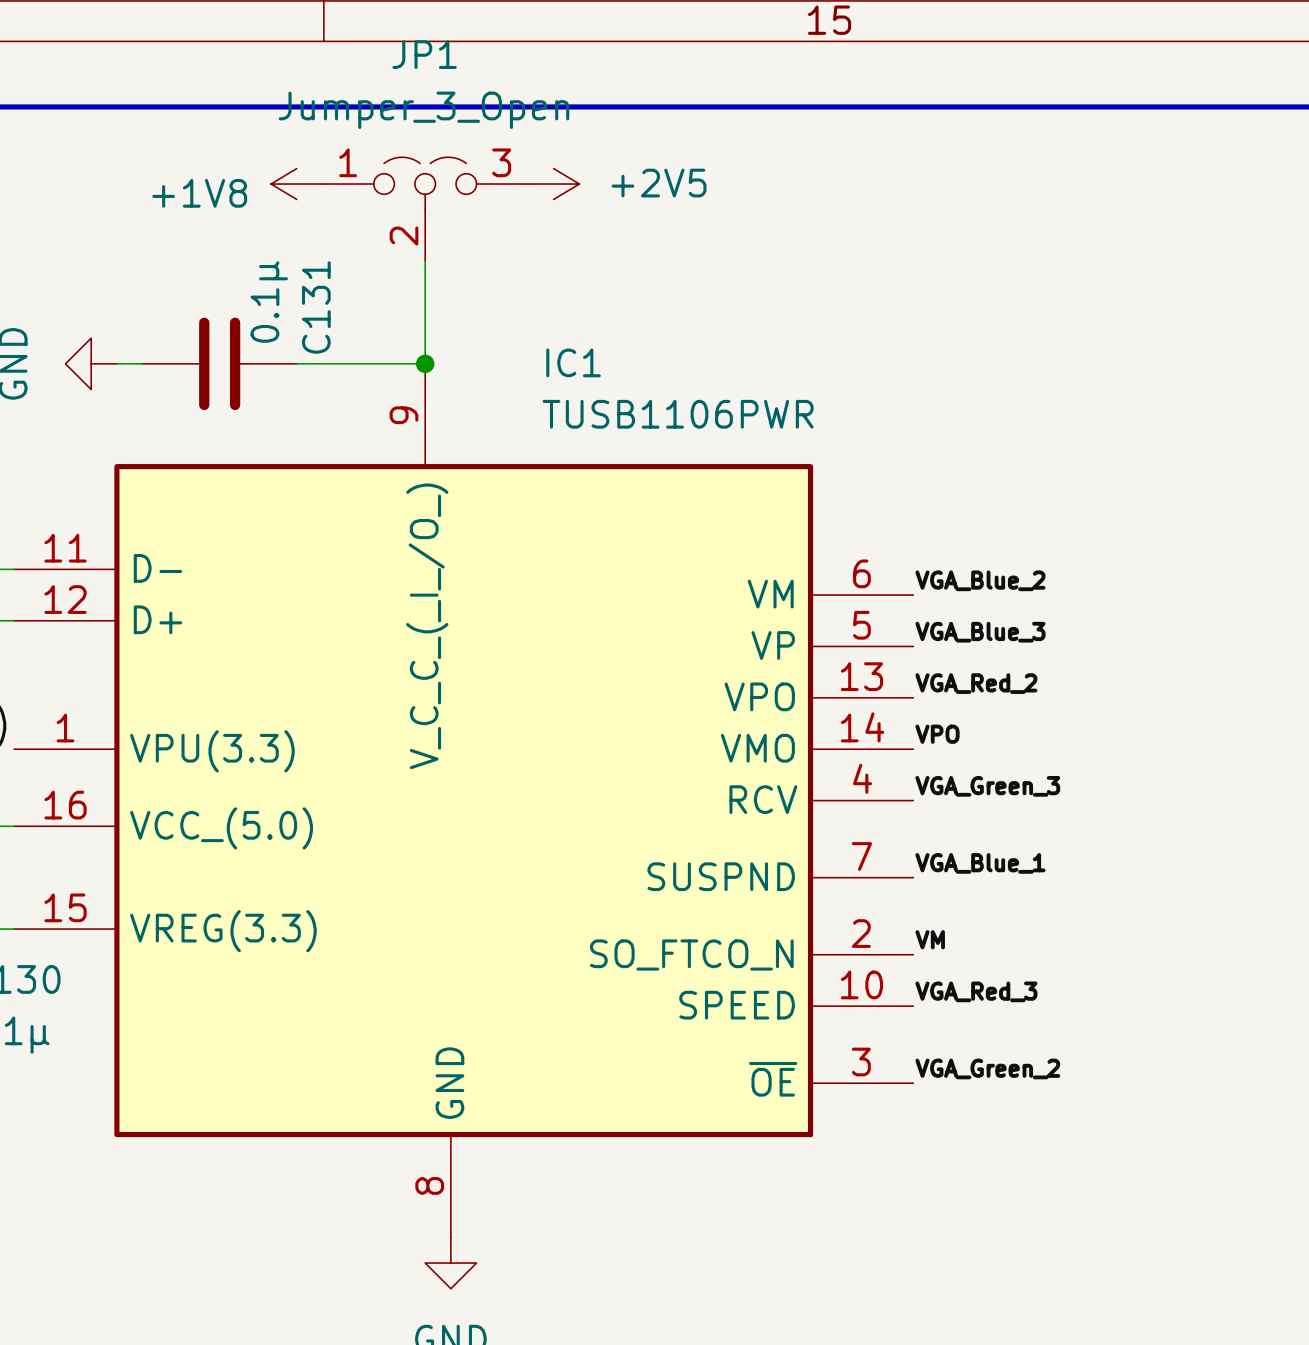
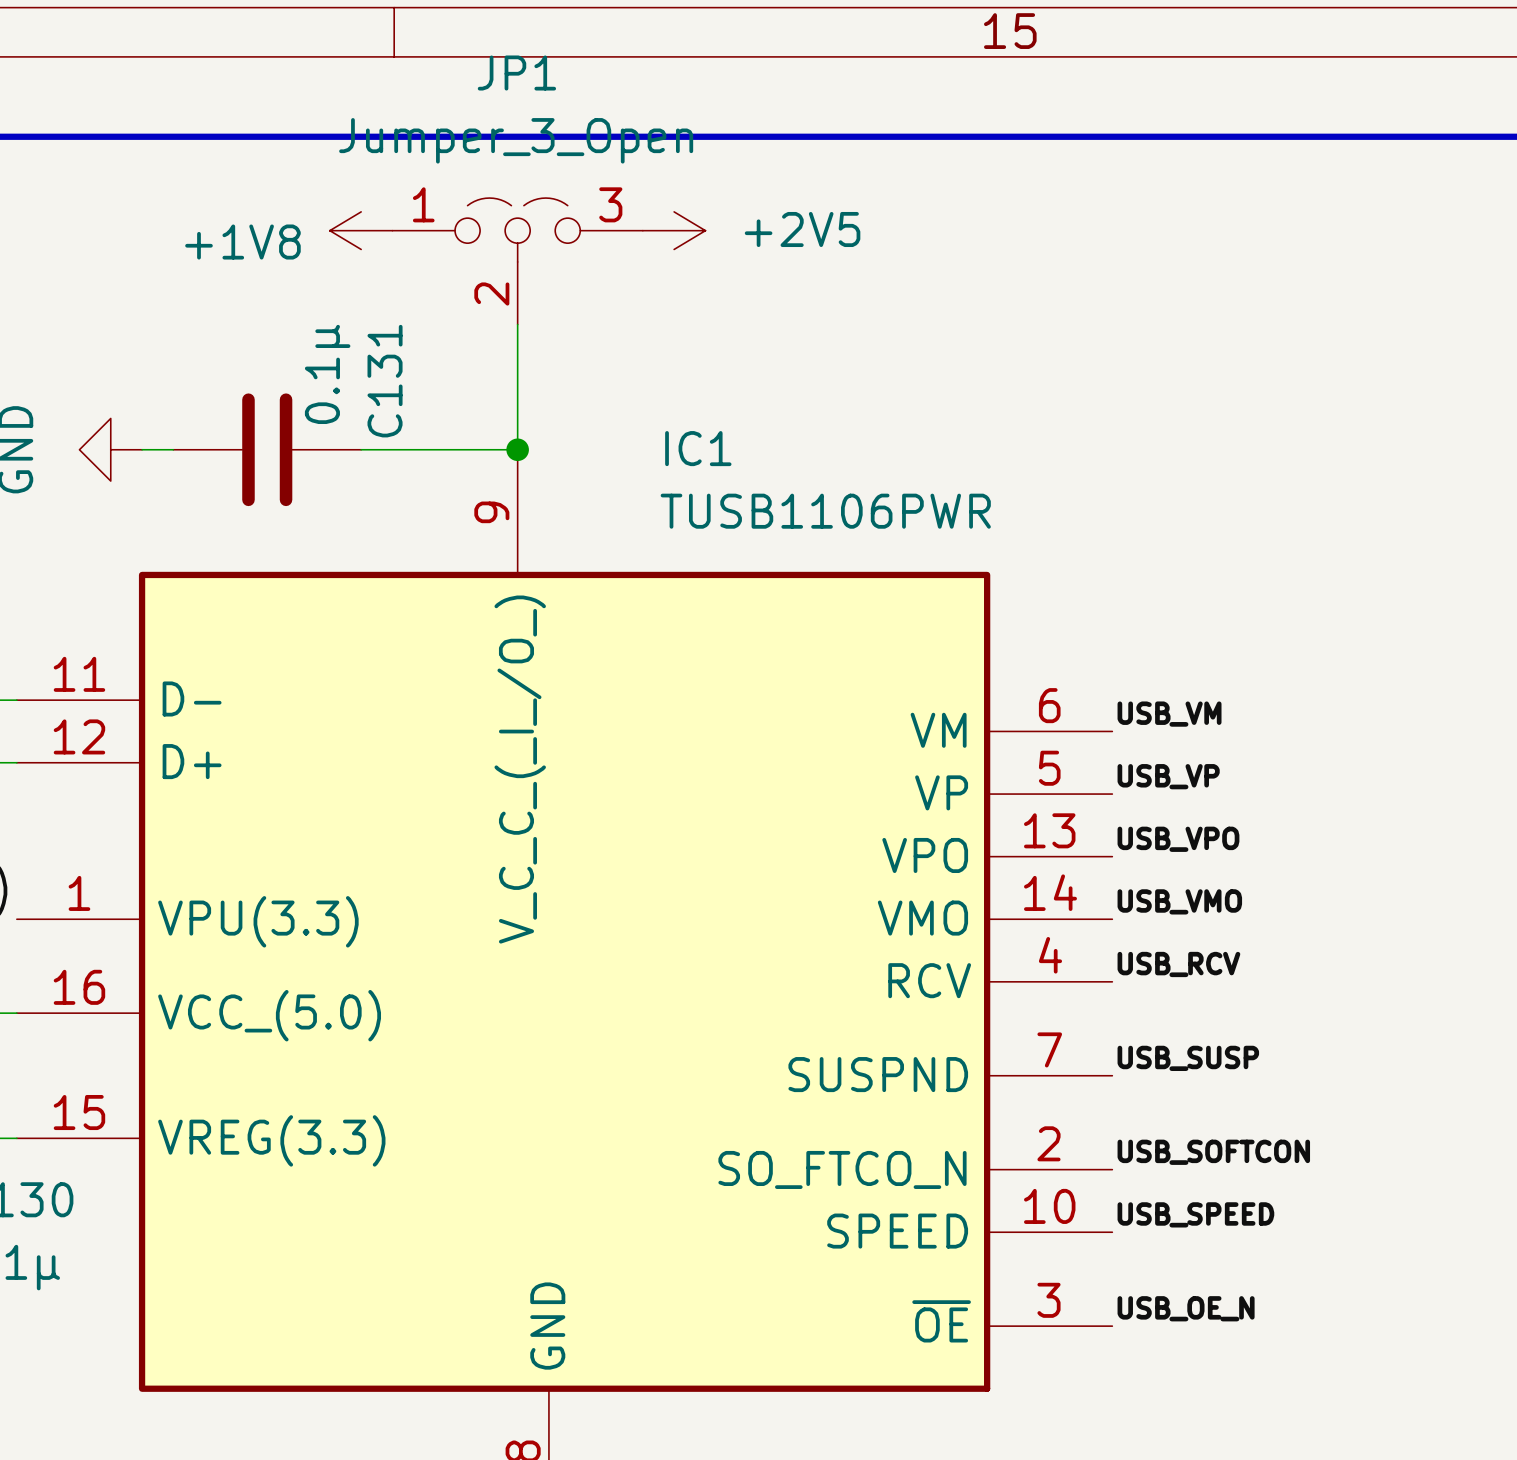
label: VGA_Blue_2 (980, 580) -> USB_VM (1169, 714)
label: VGA_Blue_3 (980, 632) -> USB_VP (1168, 776)
label: VGA_Red_2 (976, 683) -> USB_VPO (1178, 839)
label: VPO (937, 734) -> USB_VMO (1179, 901)
label: VGA_Green_3 (987, 786) -> USB_RCV (1178, 964)
label: VGA_Blue_1 (980, 863) -> USB_SUSP (1188, 1058)
label: VM (930, 939) -> USB_SOFTCON (1213, 1152)
label: VGA_Red_3 (976, 991) -> USB_SPEED (1195, 1214)
label: VGA_Green_2 (987, 1068) -> USB_OE_N (1186, 1308)

